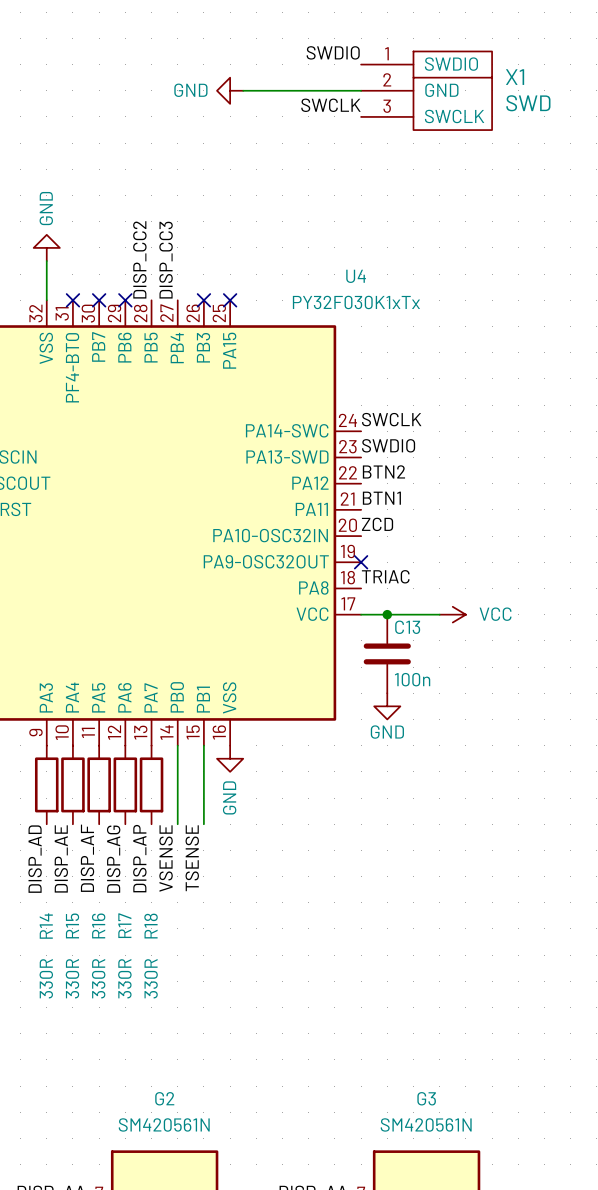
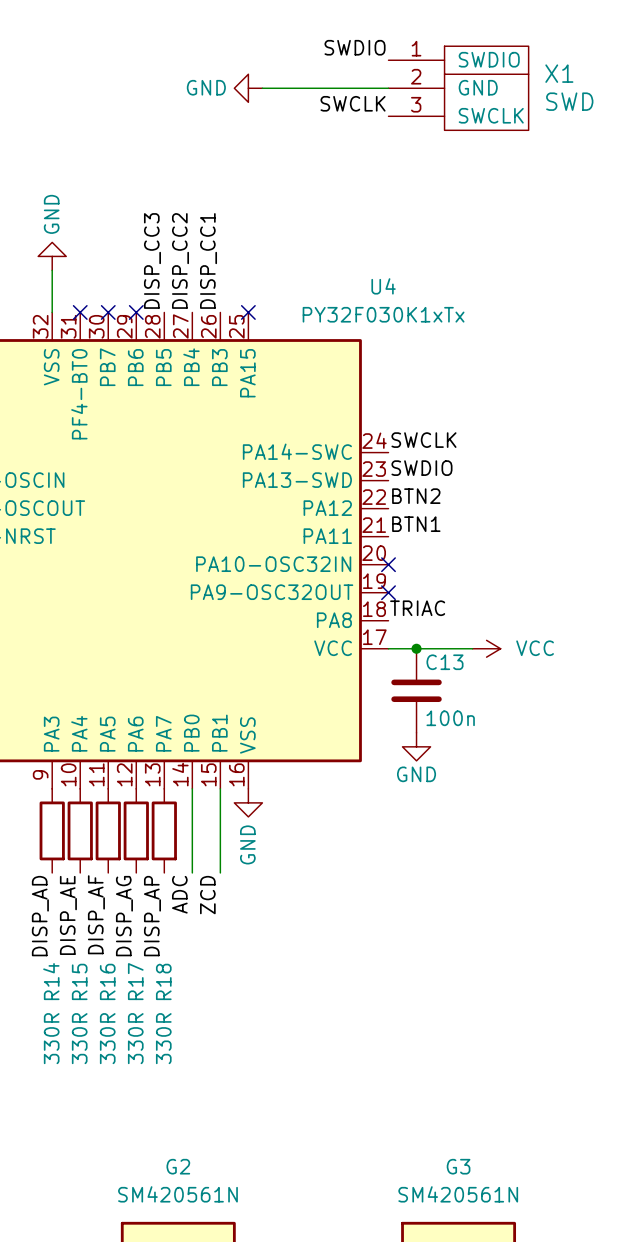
label: DISP_CC2 (139, 259) -> DISP_CC3 (152, 260)
label: DISP_CC3 (166, 260) -> DISP_CC2 (180, 260)
label: none -> DISP_CC1 (208, 260)
no-connect mark: (203, 300) -> none
label: ZCD (377, 524) -> none
no-connect mark: none -> (388, 564)
label: VSENSE (166, 858) -> ADC (179, 894)
label: TSENSE (192, 858) -> ZCD (207, 895)

